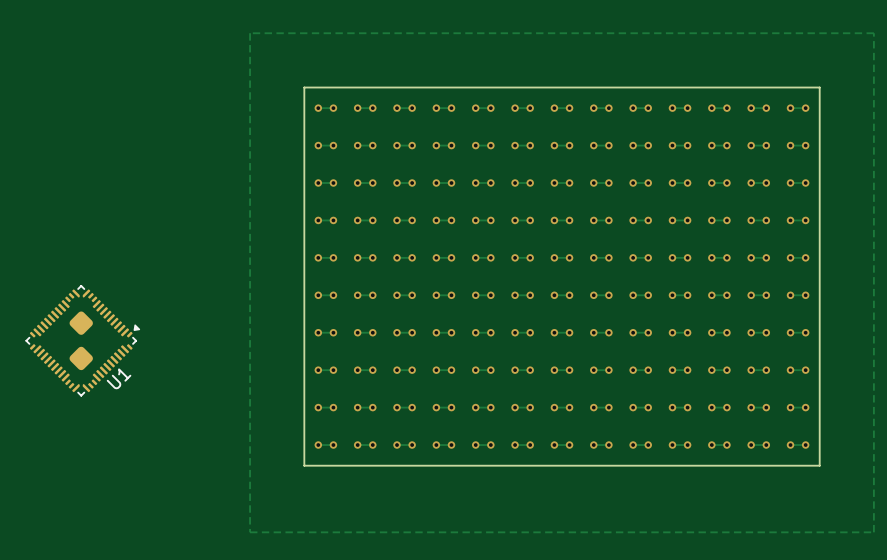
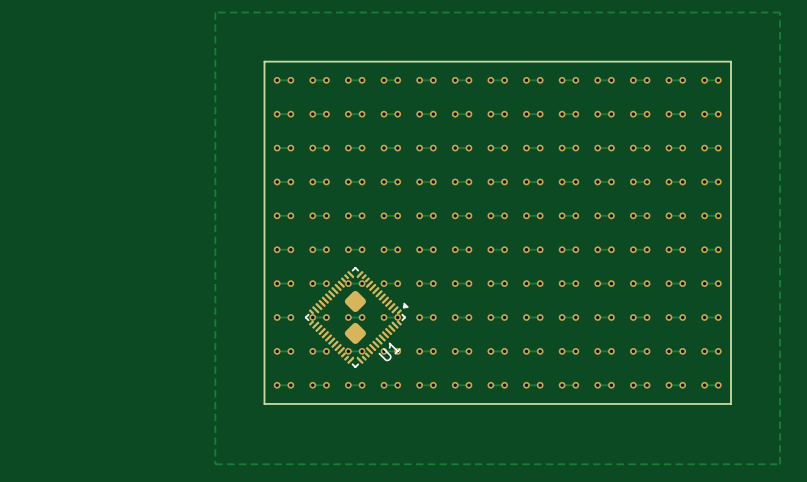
U1 position: (82, 340) -> (356, 317)

